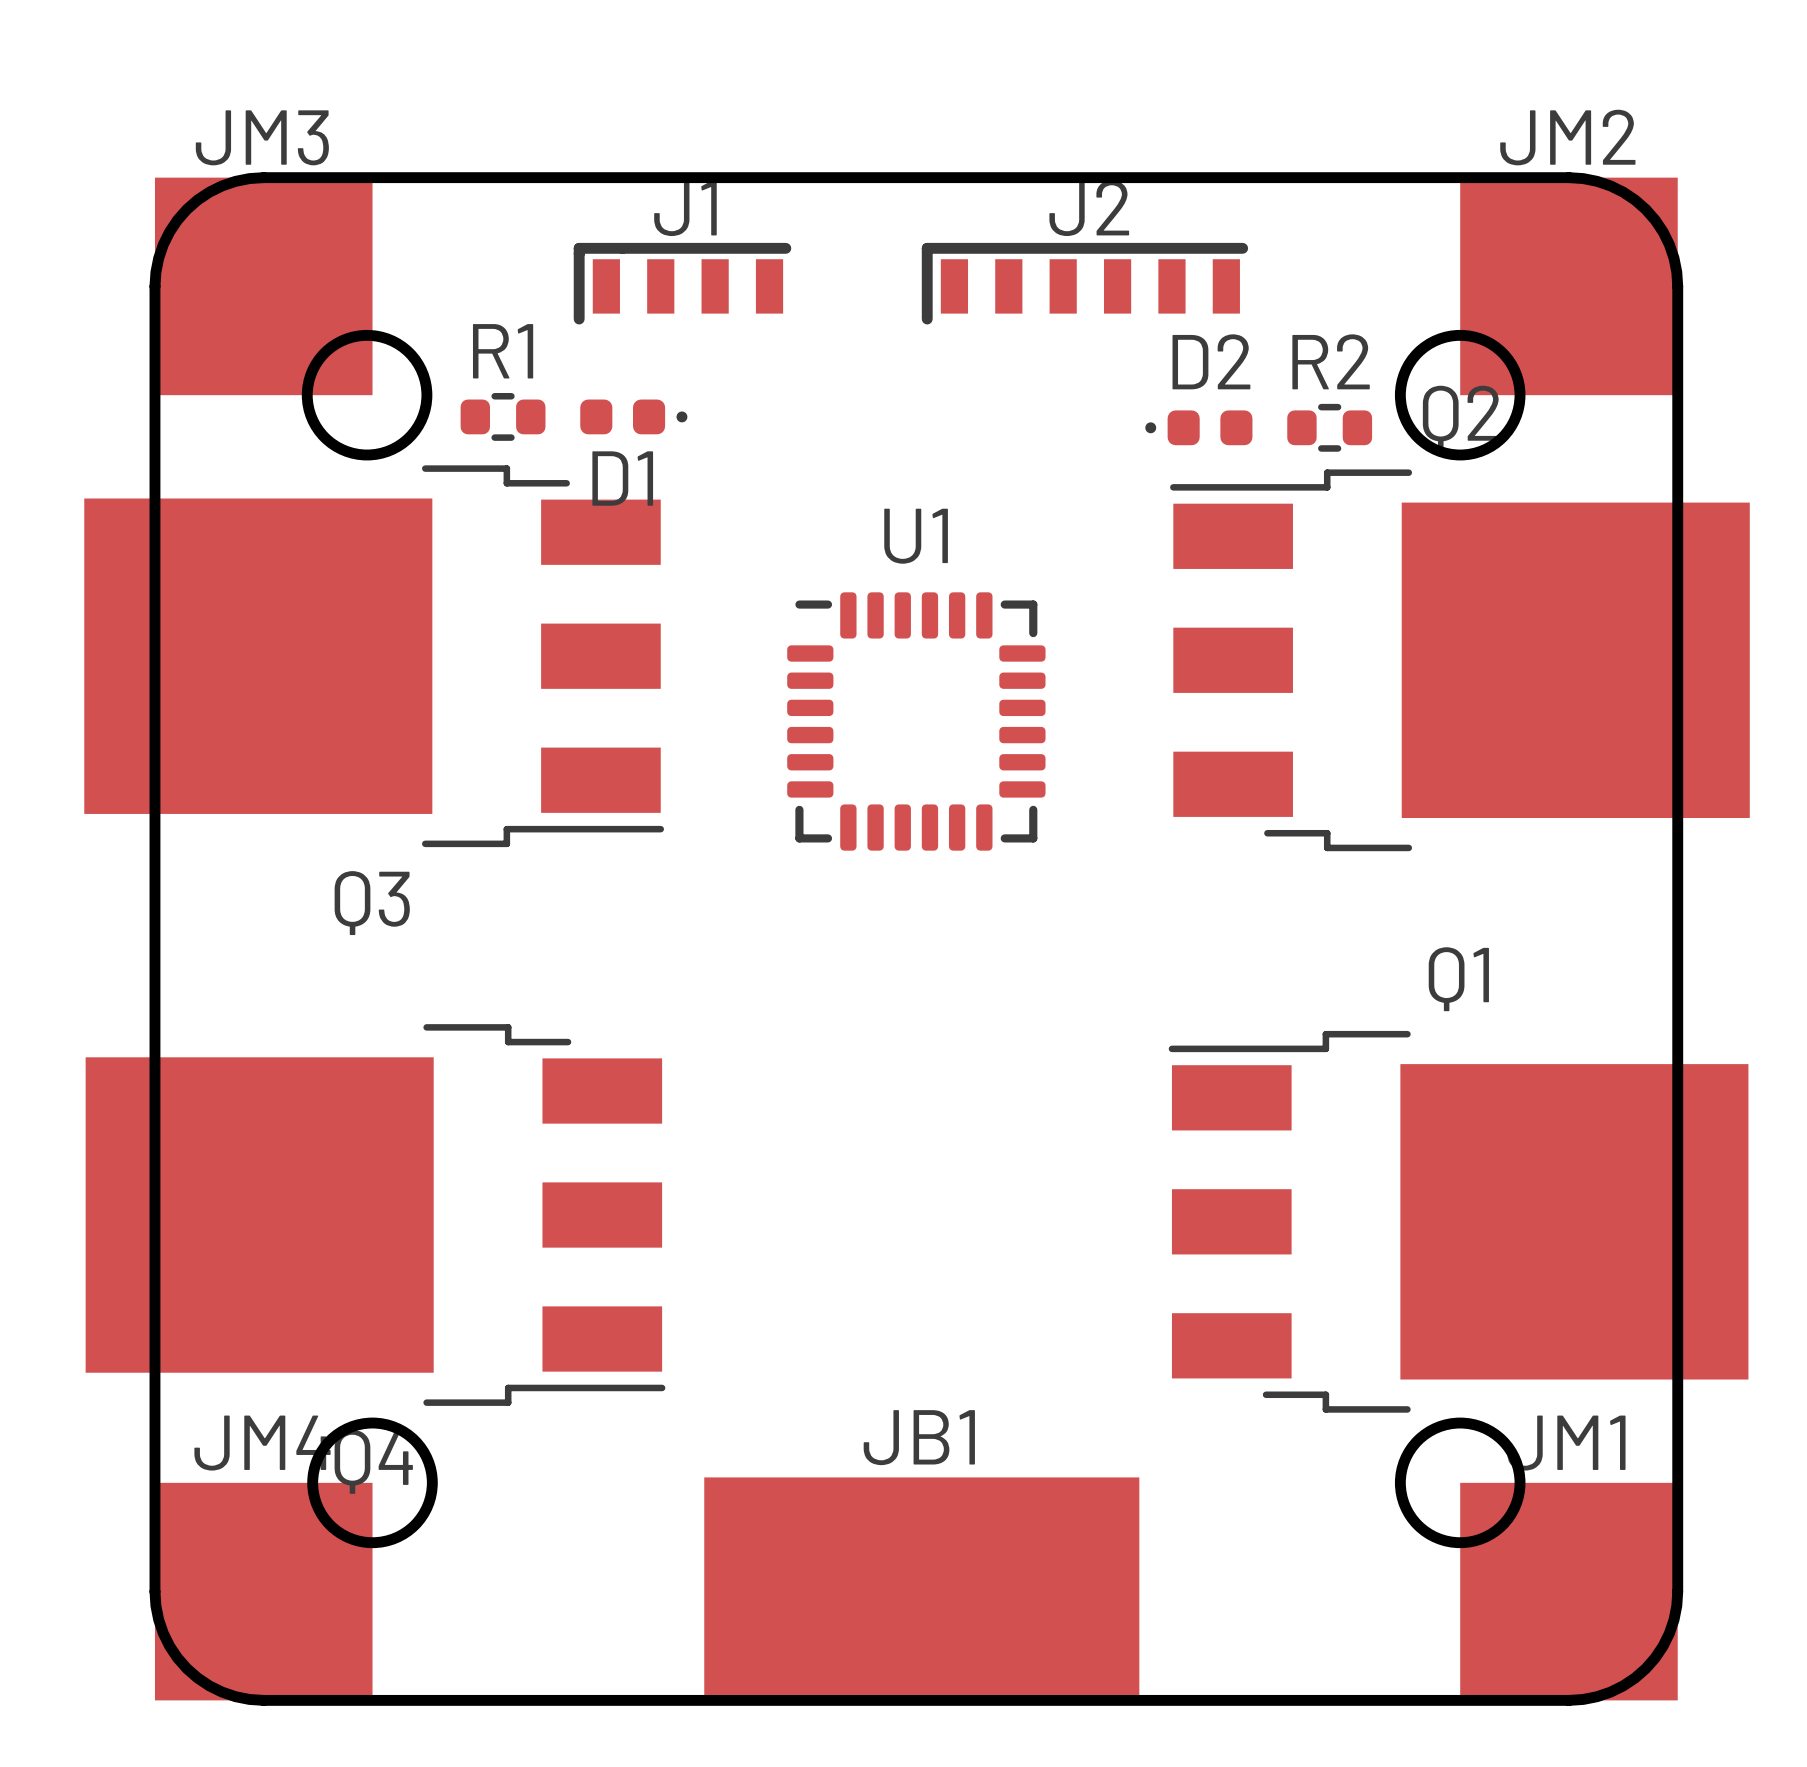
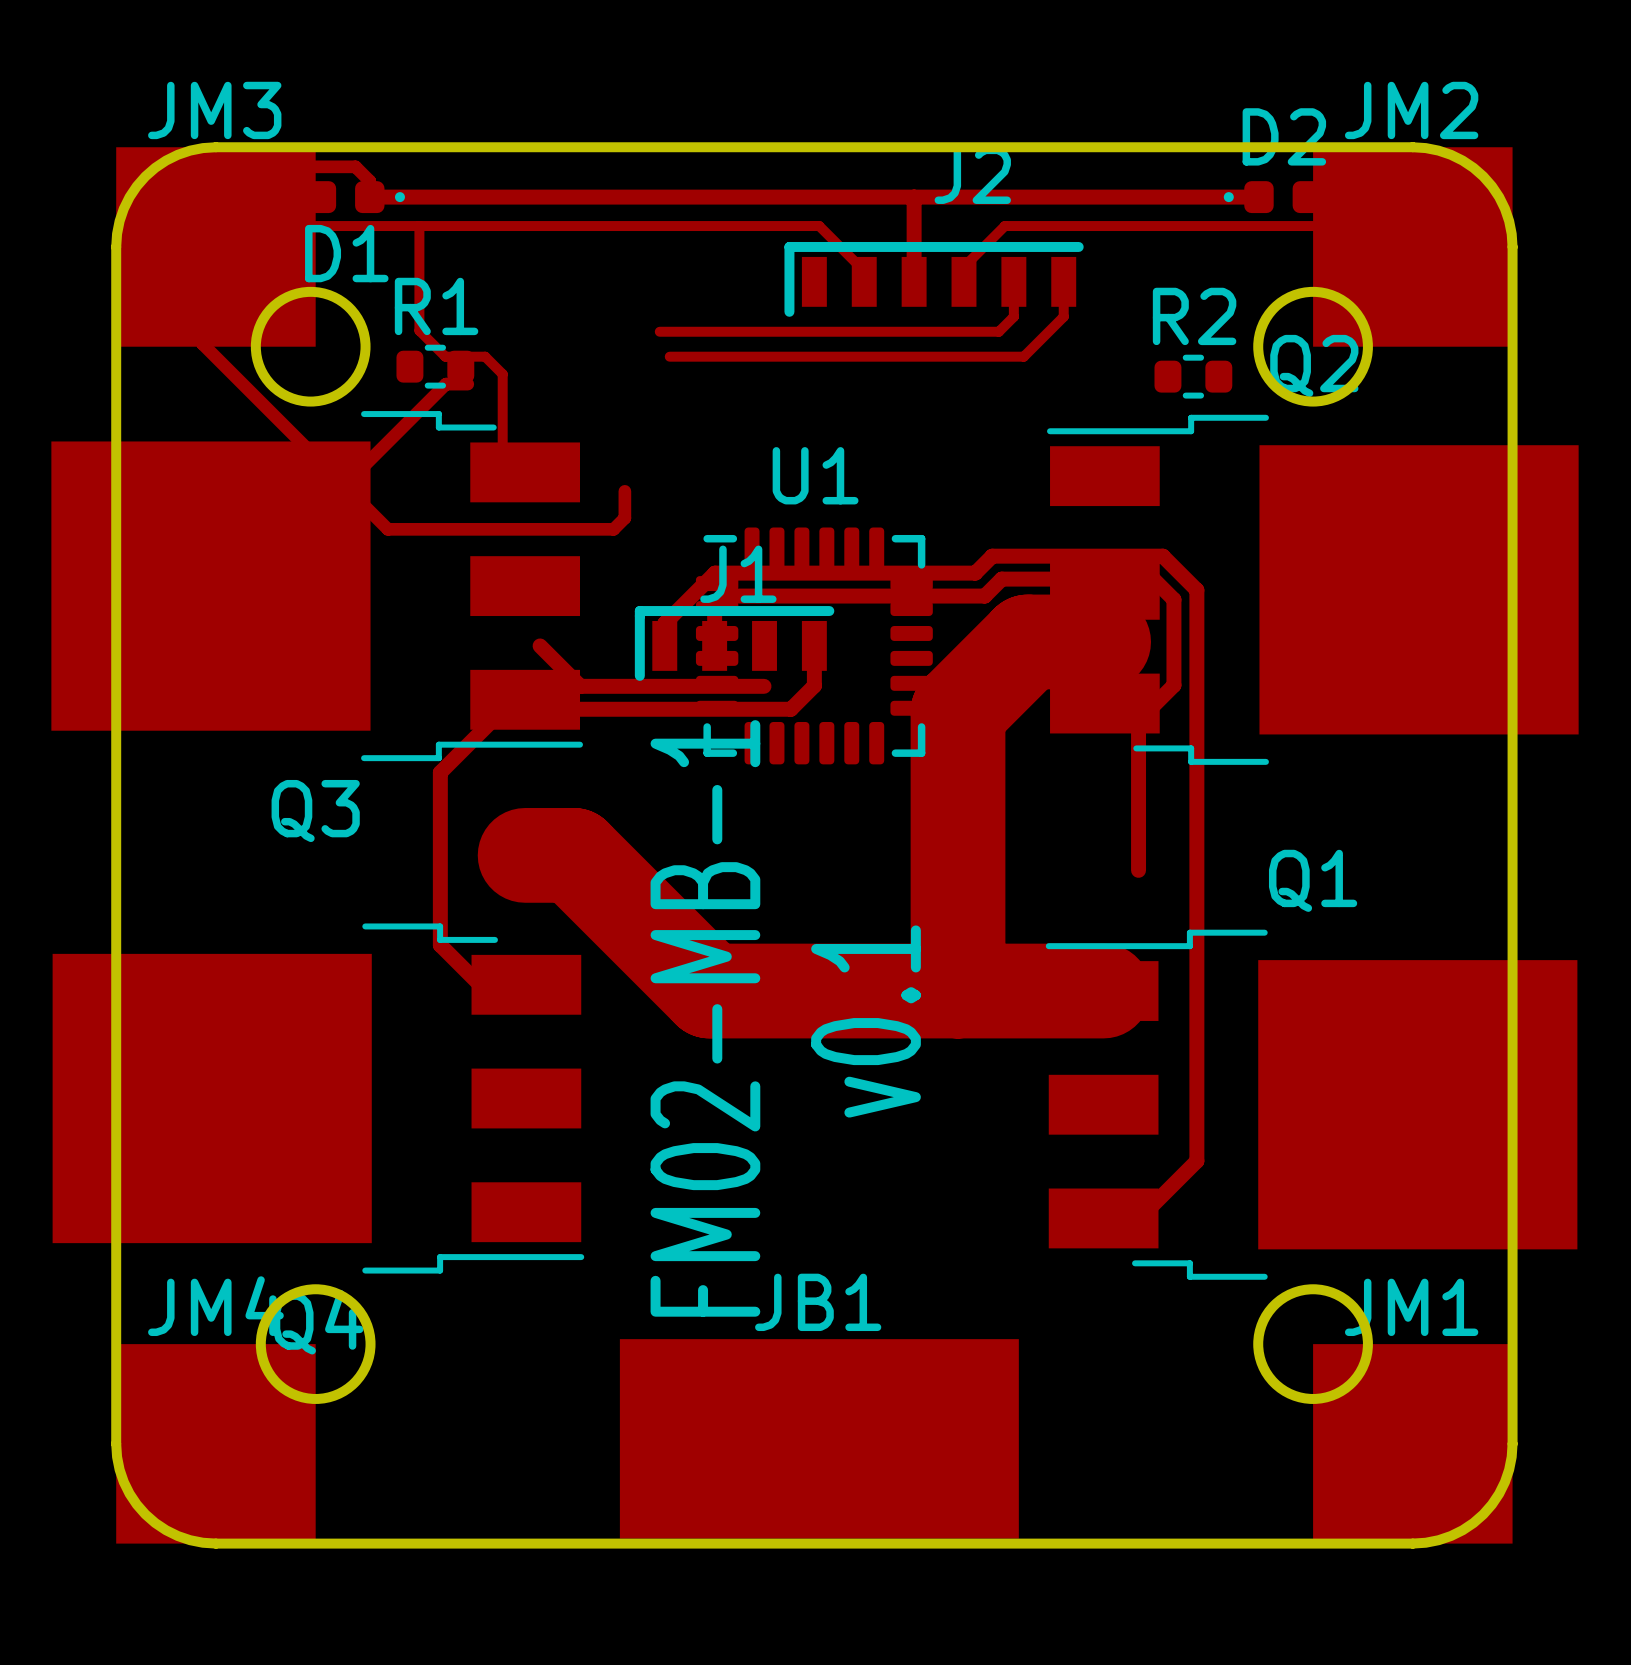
track: none -> (230, 197) (259, 226) (819, 226) (864, 271)
track: none -> (914, 197) (914, 281)
track: none -> (1263, 197) (369, 197) (369, 181) (355, 166) (214, 166) (202, 179) (202, 344) (387, 529) (613, 529) (624, 518) (624, 491)
track: none -> (1398, 197) (1369, 226) (1004, 226) (963, 266)
track: none -> (419, 226) (419, 330) (445, 356) (485, 356) (502, 374) (502, 493)
J1 position: (682, 283) -> (734, 643)
J2 position: (1084, 283) -> (934, 279)
track: none -> (1013, 281) (1013, 316) (998, 331) (659, 331)
track: none -> (1063, 281) (1063, 316) (1023, 356) (669, 356)
D1 position: (633, 416) -> (355, 197)
D2 position: (1198, 427) -> (1272, 197)
track: none -> (467, 384) (445, 384) (345, 486)
track: none -> (1103, 641) (1027, 641) (958, 711) (958, 991)
track: none -> (540, 645) (580, 686) (764, 686)
track: none -> (664, 645) (664, 623) (715, 573) (975, 573) (992, 556) (1162, 556) (1196, 590) (1196, 1161) (1138, 1219)
track: none -> (714, 645) (714, 606) (724, 596) (984, 596) (1001, 579) (1153, 579) (1173, 599) (1173, 685) (1138, 720) (1138, 870)
track: none -> (814, 645) (814, 685) (790, 709) (503, 709) (440, 772) (440, 945) (490, 995)
track: none -> (525, 855) (573, 855) (709, 991) (1103, 991)
text: none -> FM02-MB-1 (705, 1018)
text: none -> v0.1 (866, 1021)

